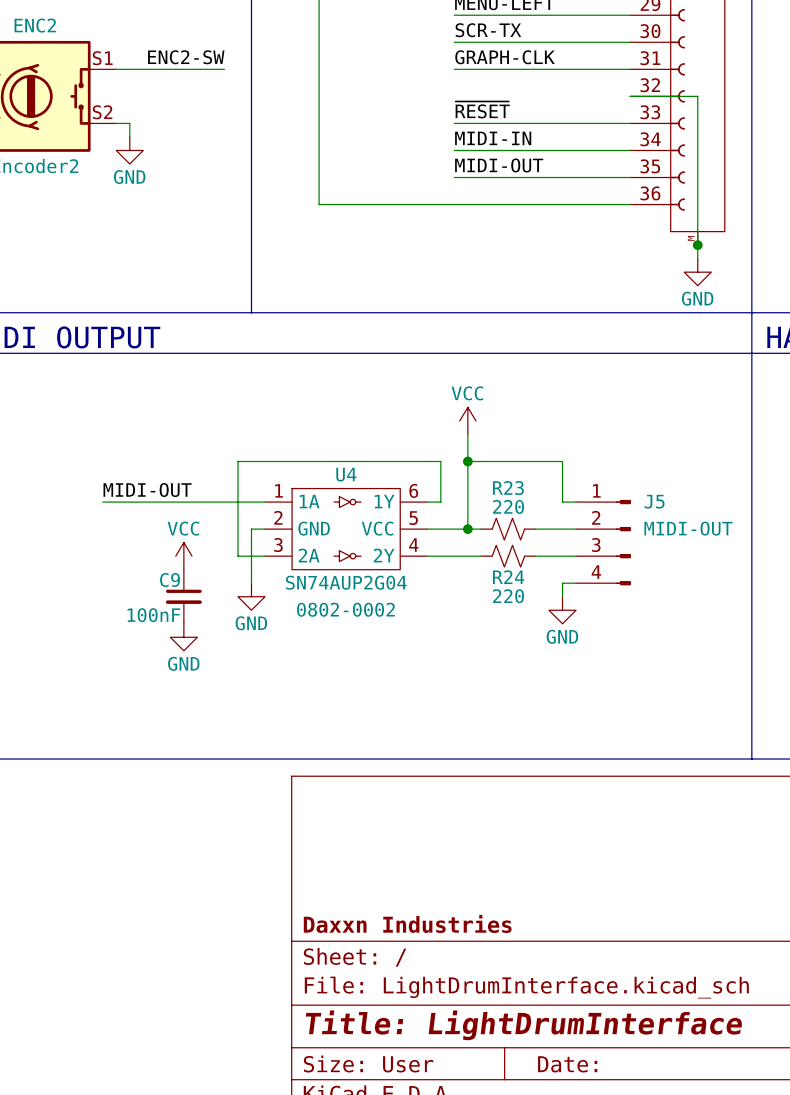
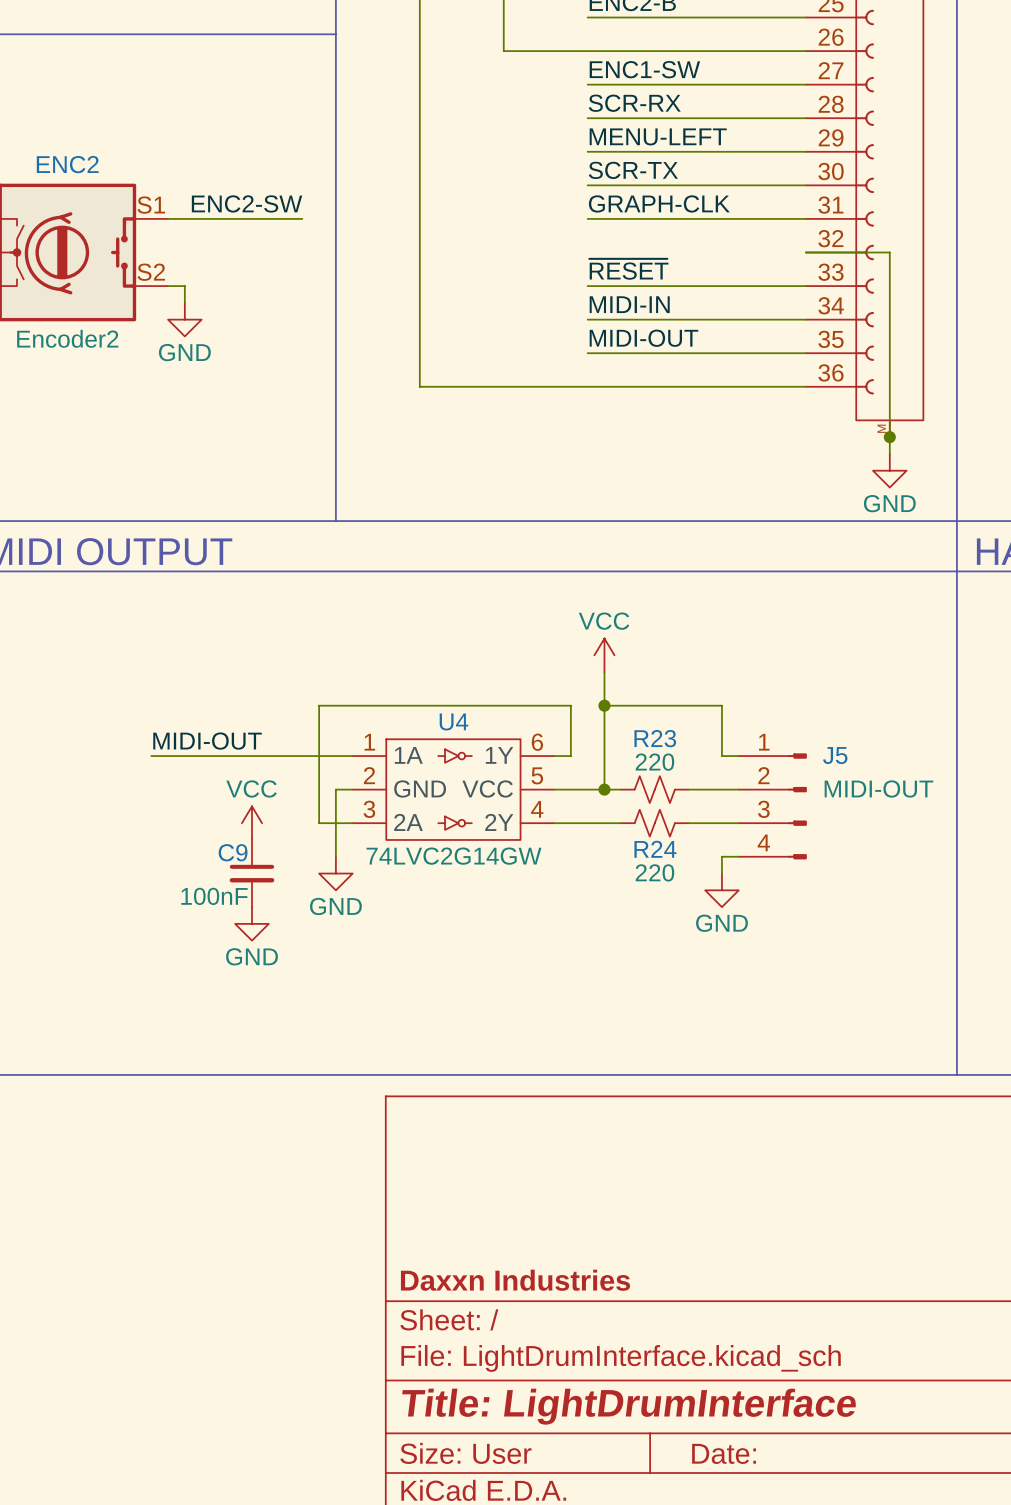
U4 value: SN74AUP2G04 (346, 582) -> 74LVC2G14GW (453, 856)
U4 text: 0802-0002 (345, 609) -> none

